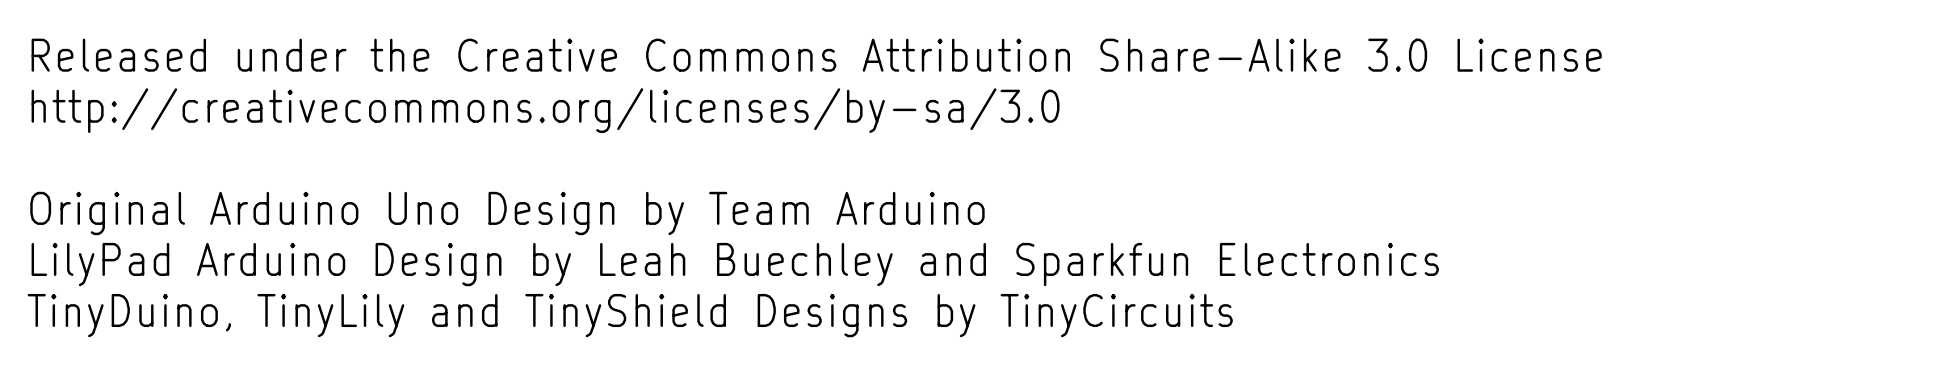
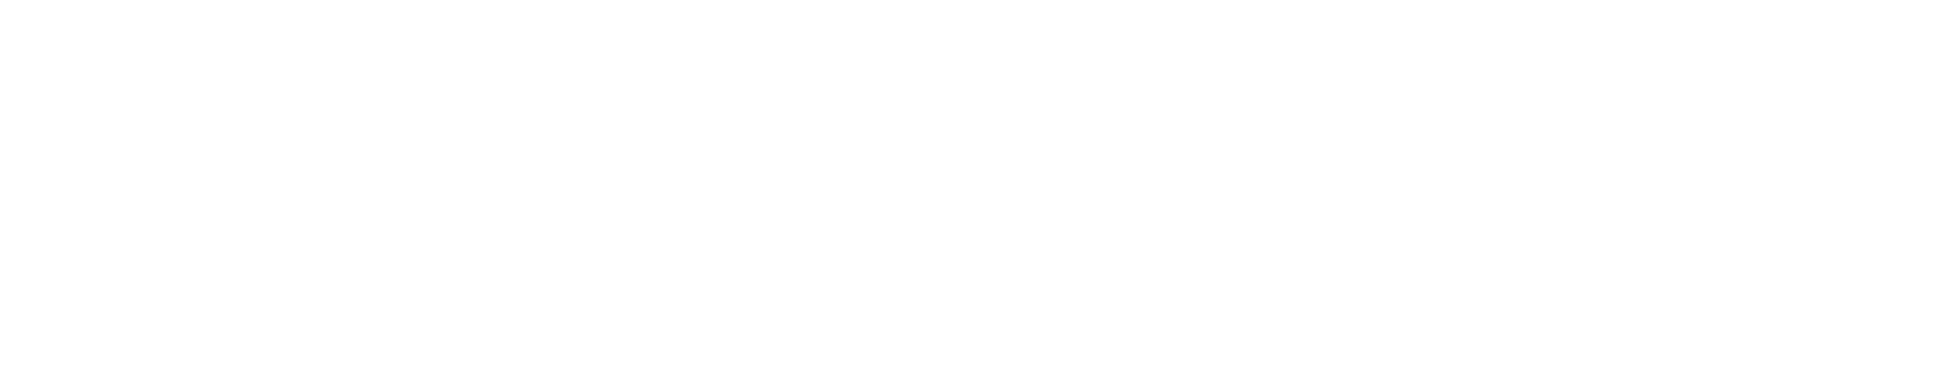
text: Released under the Creative Commons Attribution Share-Alike 3.0 License (816, 55) -> none
text: http://creativecommons.org/licenses/by-sa/3.0 (545, 110) -> none
text: Original Arduino Uno Design by Team Arduino (507, 213) -> none
text: LilyPad Arduino Design by Leah Buechley and Sparkfun Electronics (735, 264) -> none
text: TinyDuino, TinyLily and TinyShield Designs by TinyCircuits (630, 315) -> none

